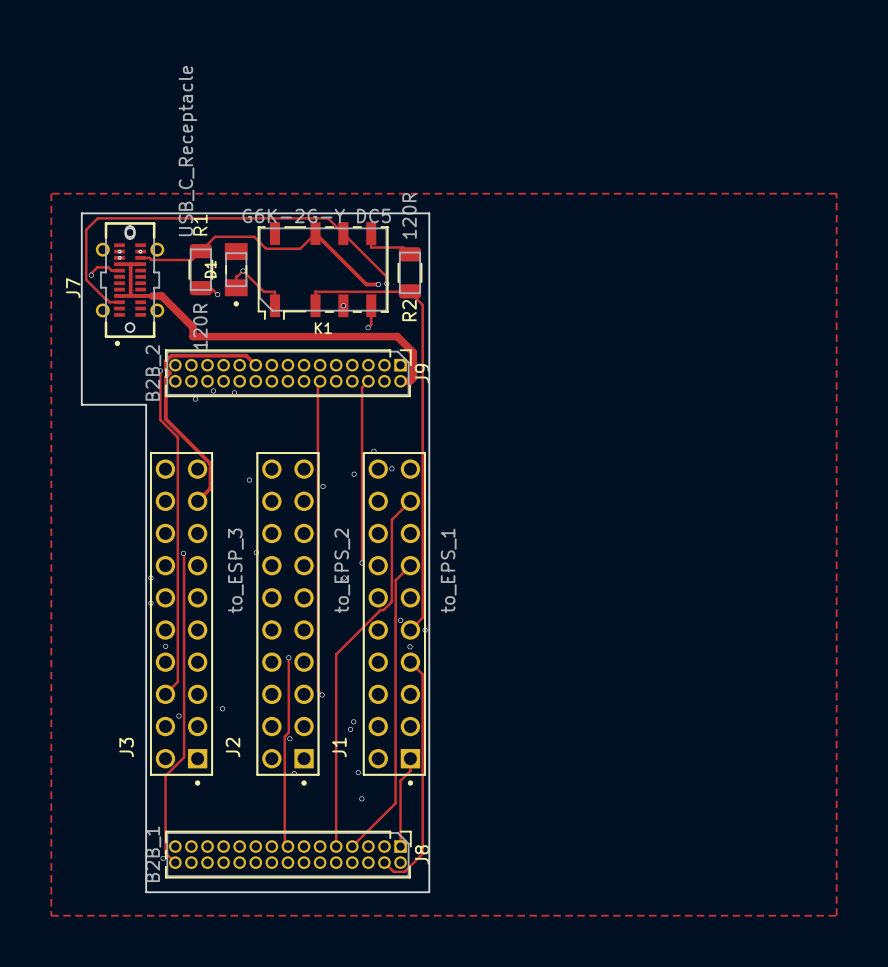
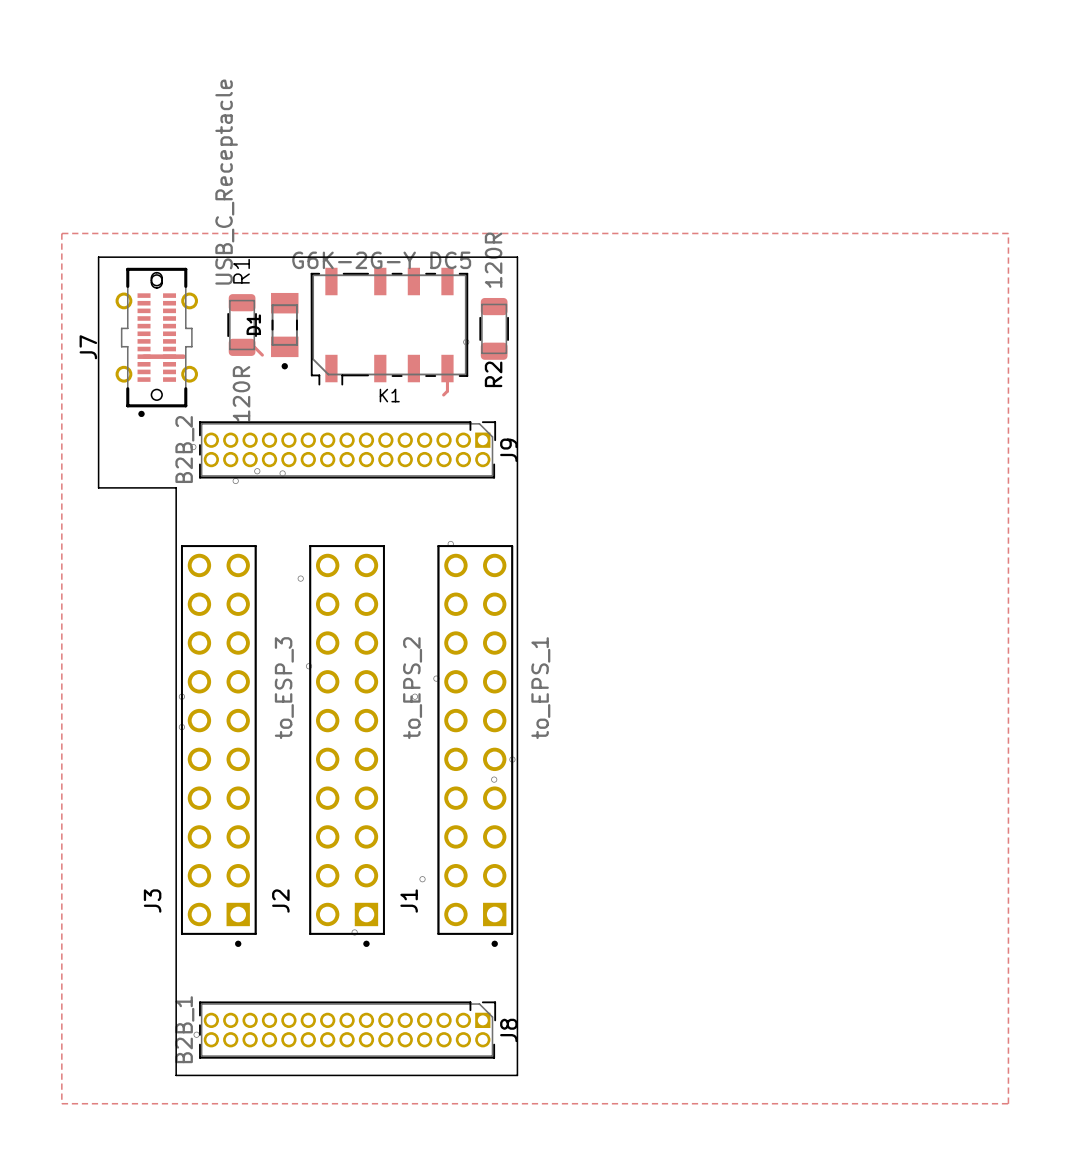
track: (371, 233) (371, 247) (403, 247) (409, 254) -> none
via: (119, 251) -> none
via: (140, 251) -> none
via: (119, 257) -> none
track: (140, 257) (149, 257) (151, 260) (191, 260) (215, 236) (254, 236) (266, 248) (300, 248) (315, 233) (366, 284) (378, 284) -> none
track: (119, 264) (140, 264) -> none
track: (130, 264) (130, 295) -> none
track: (119, 270) (111, 270) (108, 267) (97, 267) (91, 275) -> none
via: (243, 270) -> none
via: (91, 275) -> none
track: (386, 283) (386, 276) (328, 218) (97, 218) (86, 229) (86, 279) (109, 302) (119, 302) -> none
via: (378, 284) -> none
track: (236, 287) (236, 276) (243, 270) (263, 291) (274, 291) (274, 305) -> none
track: (409, 291) (315, 291) (315, 305) -> none
track: (409, 291) (422, 304) (422, 617) (410, 630) -> none
via: (217, 294) -> none
track: (152, 296) (161, 296) (193, 327) (193, 336) (397, 336) (413, 352) (413, 377) (409, 381) (400, 381) -> none
via: (343, 305) -> none
via: (368, 327) -> none
track: (255, 365) (246, 355) (171, 355) (165, 361) (165, 369) (169, 373) (165, 377) (165, 419) (210, 463) (210, 488) (197, 501) -> none
track: (160, 370) (160, 419) (177, 437) (177, 681) (165, 694) -> none
track: (320, 381) (317, 383) (317, 690) (322, 694) -> none
track: (368, 381) (362, 387) (362, 563) -> none
via: (391, 468) -> none
via: (354, 474) -> none
via: (323, 486) -> none
track: (410, 501) (391, 519) (391, 601) (383, 610) (380, 610) (336, 654) (336, 846) -> none
track: (183, 553) (184, 757) (165, 775) (165, 852) (175, 862) -> none
via: (183, 553) -> none
track: (410, 565) (395, 580) (395, 618) -> none
track: (395, 618) (395, 803) (352, 846) -> none
via: (400, 620) -> none
via: (165, 646) -> none
track: (288, 657) (288, 732) (284, 736) (284, 843) (287, 846) -> none
via: (288, 657) -> none
track: (410, 662) (422, 674) (422, 853) (404, 871) (393, 871) (384, 862) -> none
via: (322, 694) -> none
via: (222, 708) -> none
via: (179, 716) -> none
via: (353, 721) -> none
via: (289, 738) -> none
track: (410, 758) (410, 770) (400, 780) (400, 846) -> none
via: (358, 772) -> none
via: (361, 798) -> none

